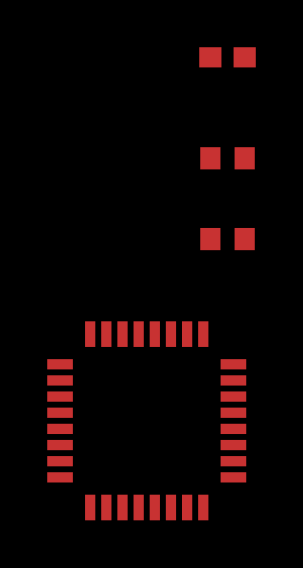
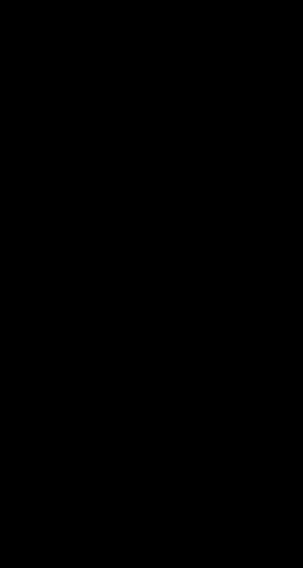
part: (227, 57) -> none
part: (227, 158) -> none
part: (227, 239) -> none
part: (146, 420) -> none

